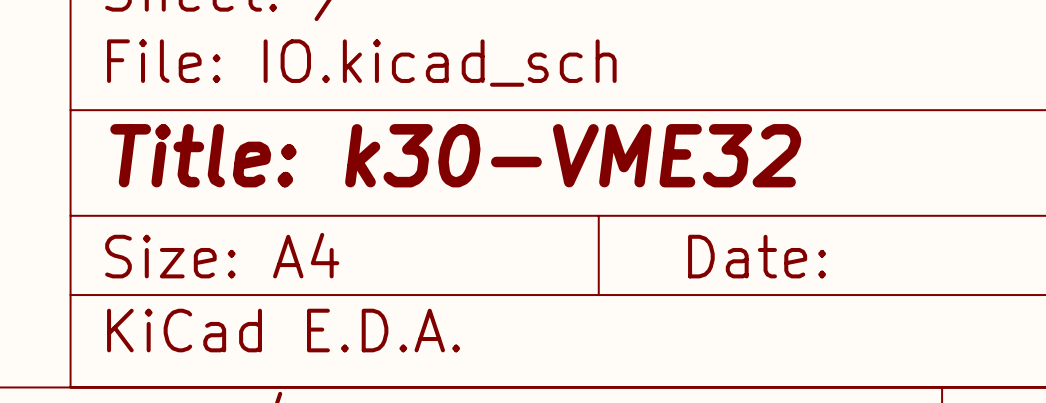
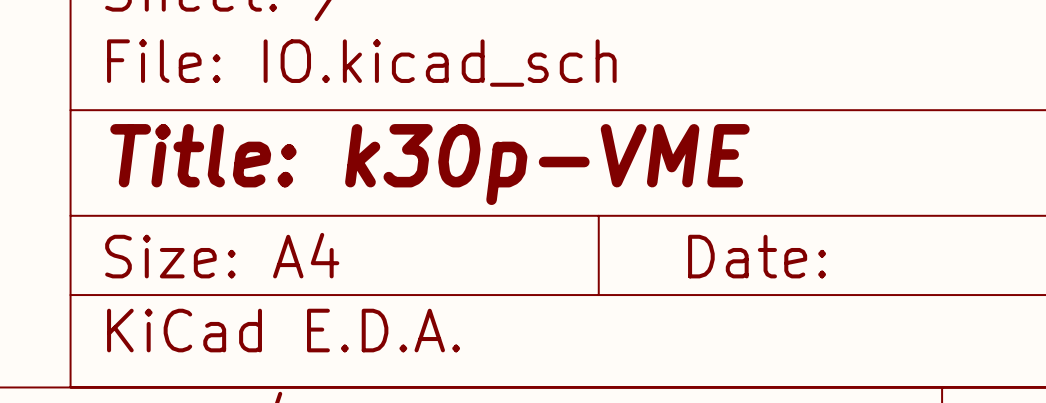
title block: Title: k30-VME32 (455, 155) -> Title: k30p-VME (429, 164)

